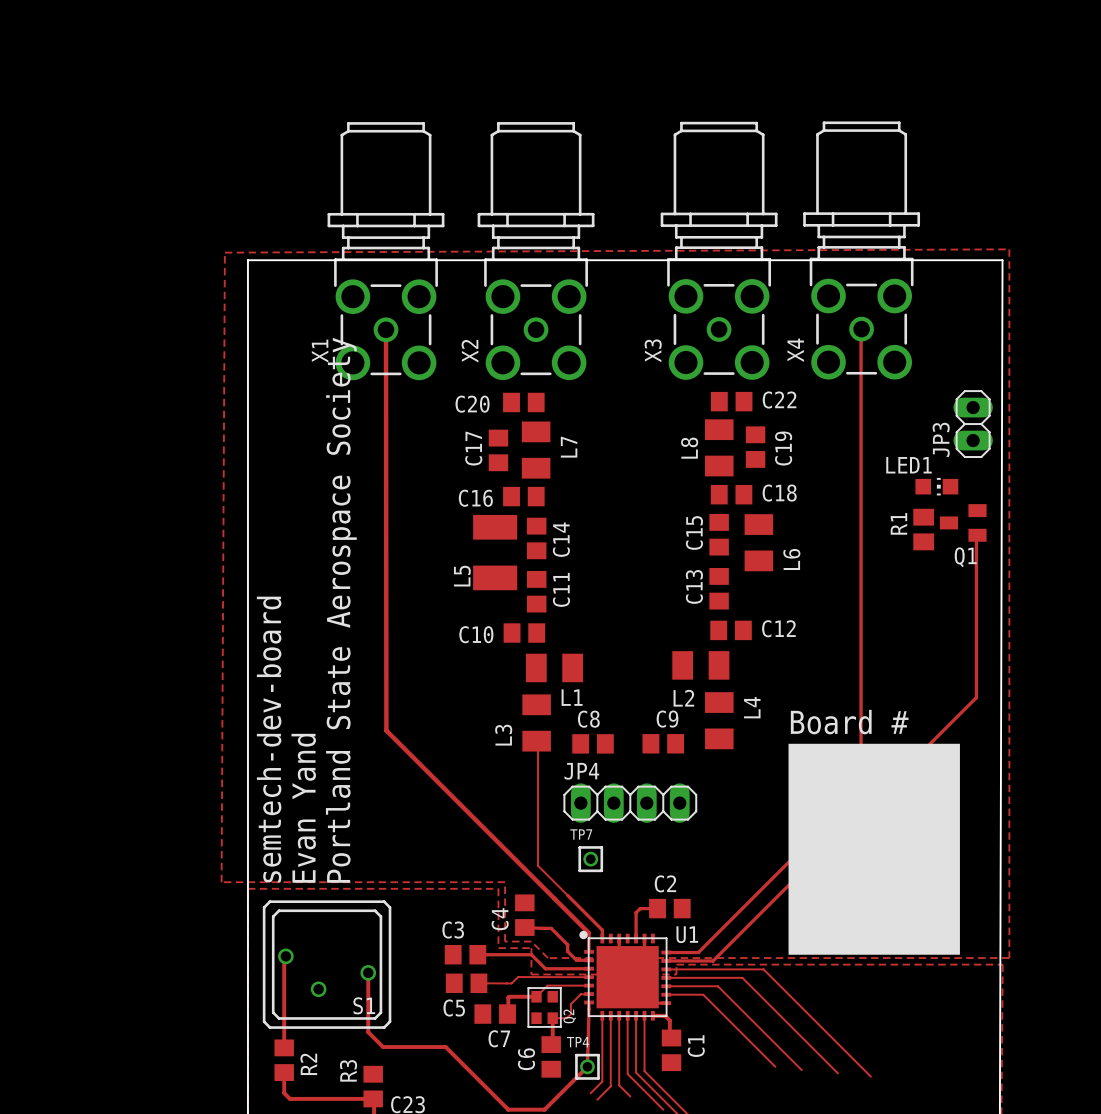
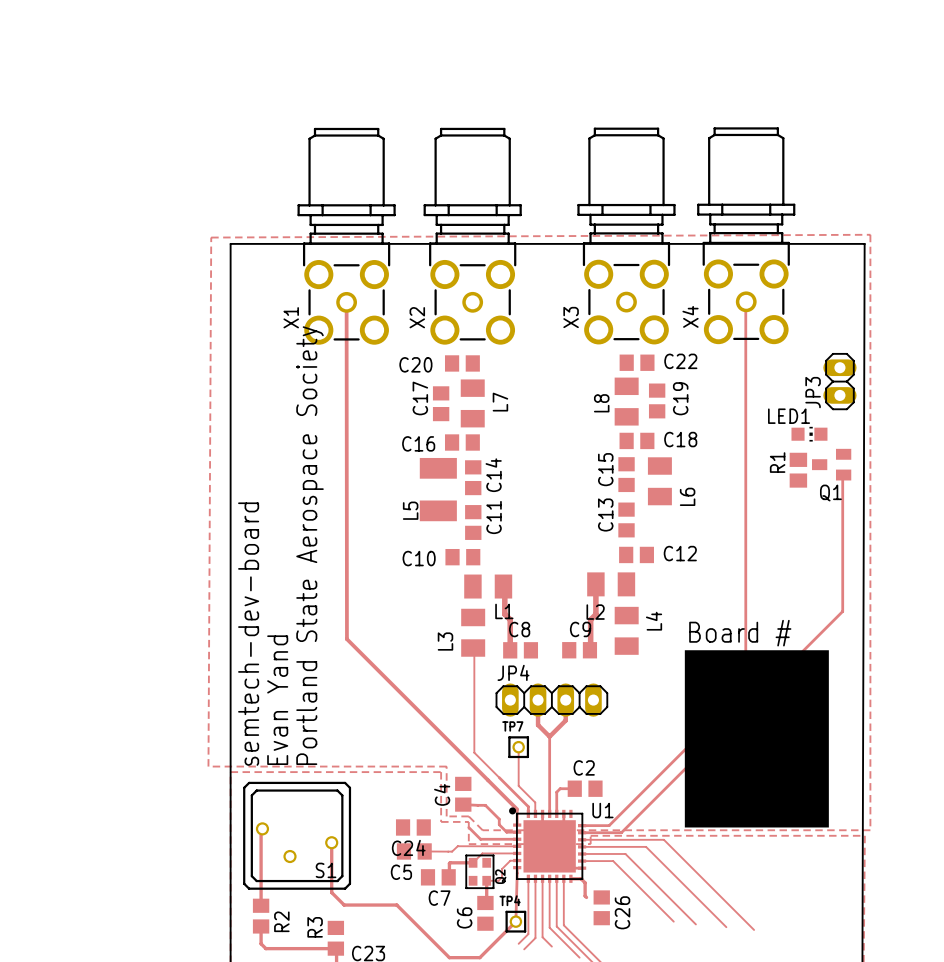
top track: none -> (595, 584) (595, 614) (590, 619) (589, 650)
top track: none -> (503, 586) (504, 614) (510, 619) (510, 650)
top track: none -> (538, 700) (538, 725) (549, 736)
top track: none -> (565, 700) (565, 720) (549, 736)
top track: none -> (549, 736) (549, 813)
top track: none -> (518, 747) (518, 785) (535, 802) (535, 813)
C3 name: C3 (453, 930) -> C24 (408, 847)
top track: (477, 954) (531, 954) -> none
C1: (671, 1050) -> none
C26: none -> (601, 907)

